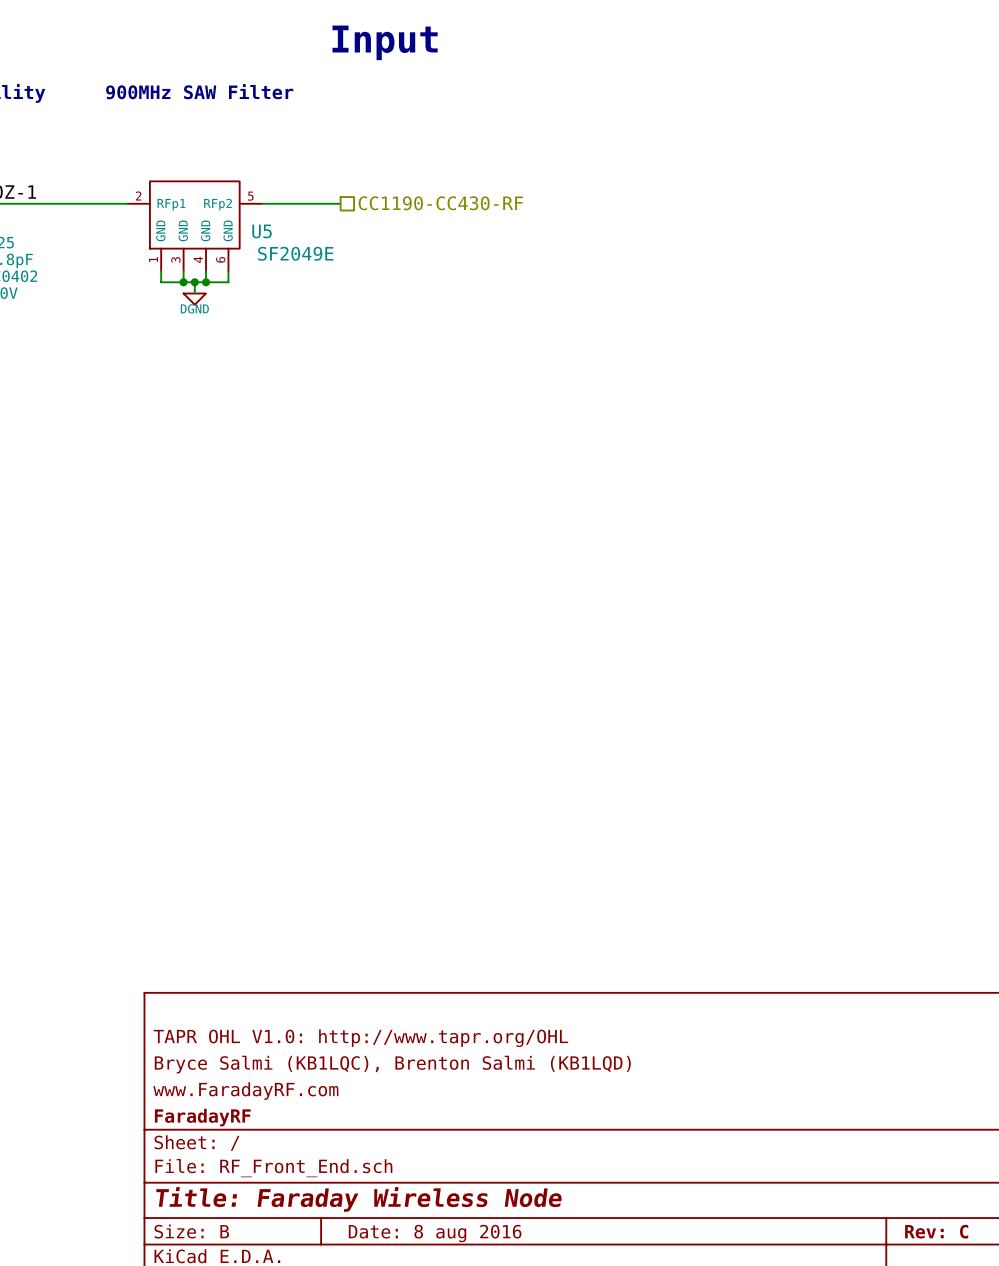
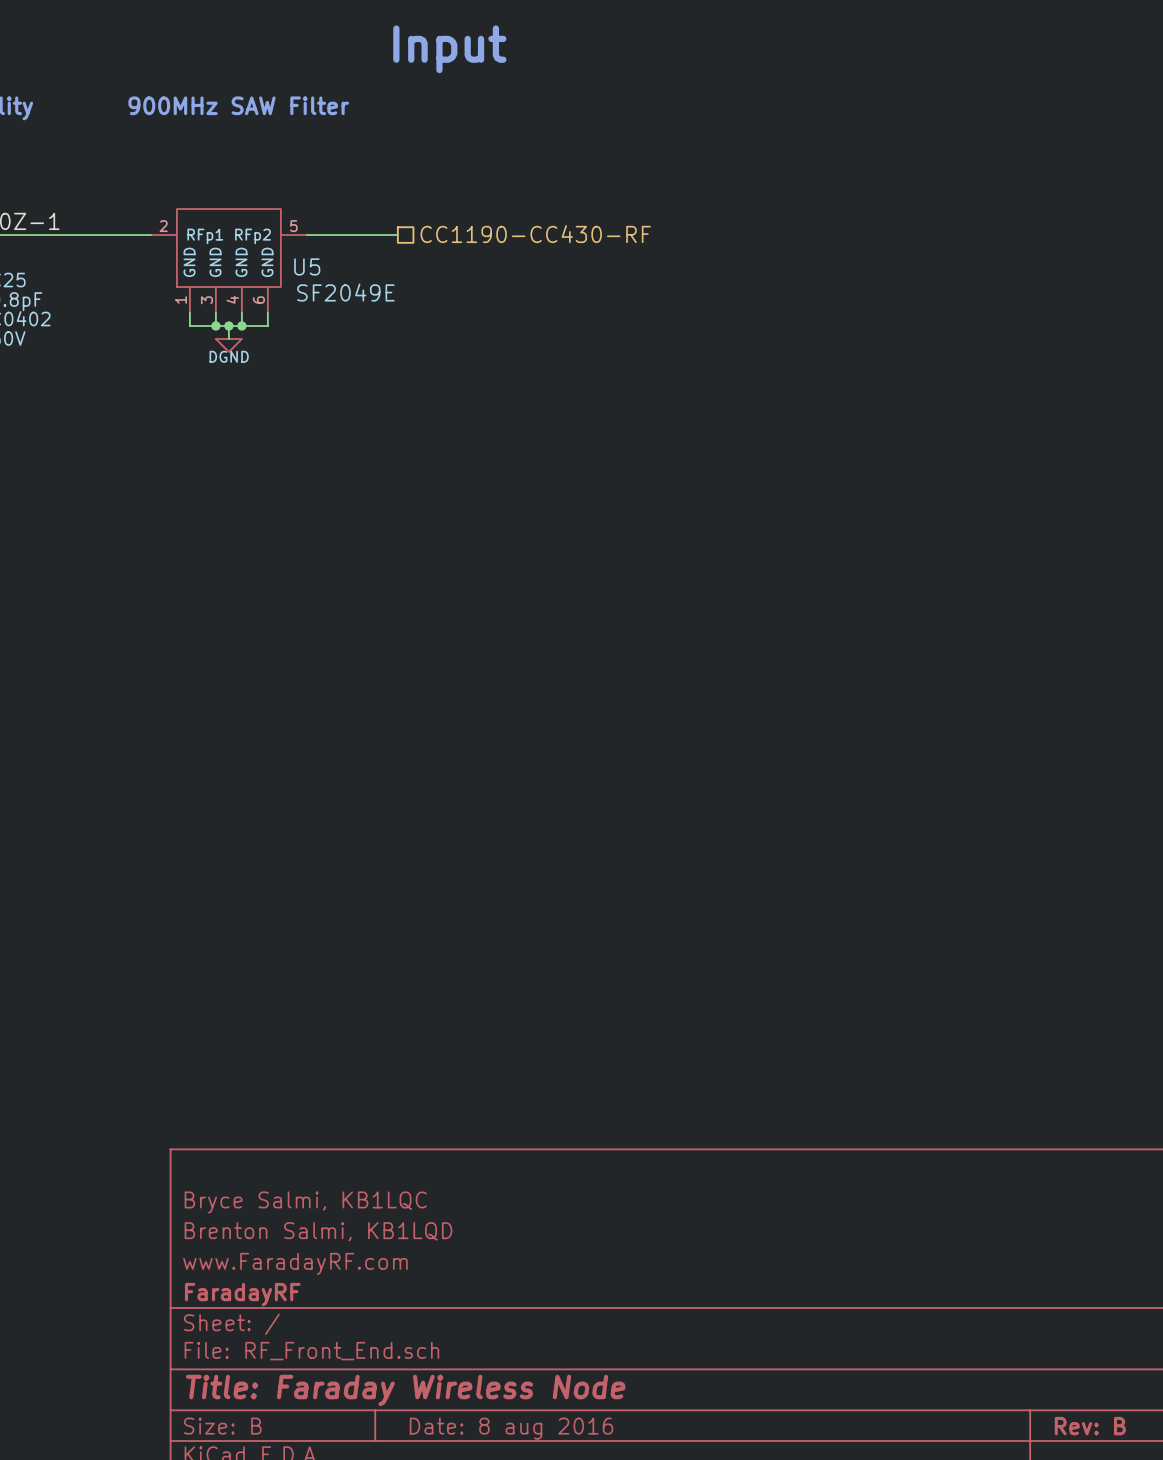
title block: TAPR OHL V1.0: http://www.tapr.org/OHL (360, 1038) -> Bryce Salmi, KB1LQC (305, 1202)
title block: Bryce Salmi (KB1LQC), Brenton Salmi (KB1LQD) (392, 1064) -> Brenton Salmi, KB1LQD (318, 1231)
title block: Rev: C (936, 1231) -> Rev: B (1090, 1426)

